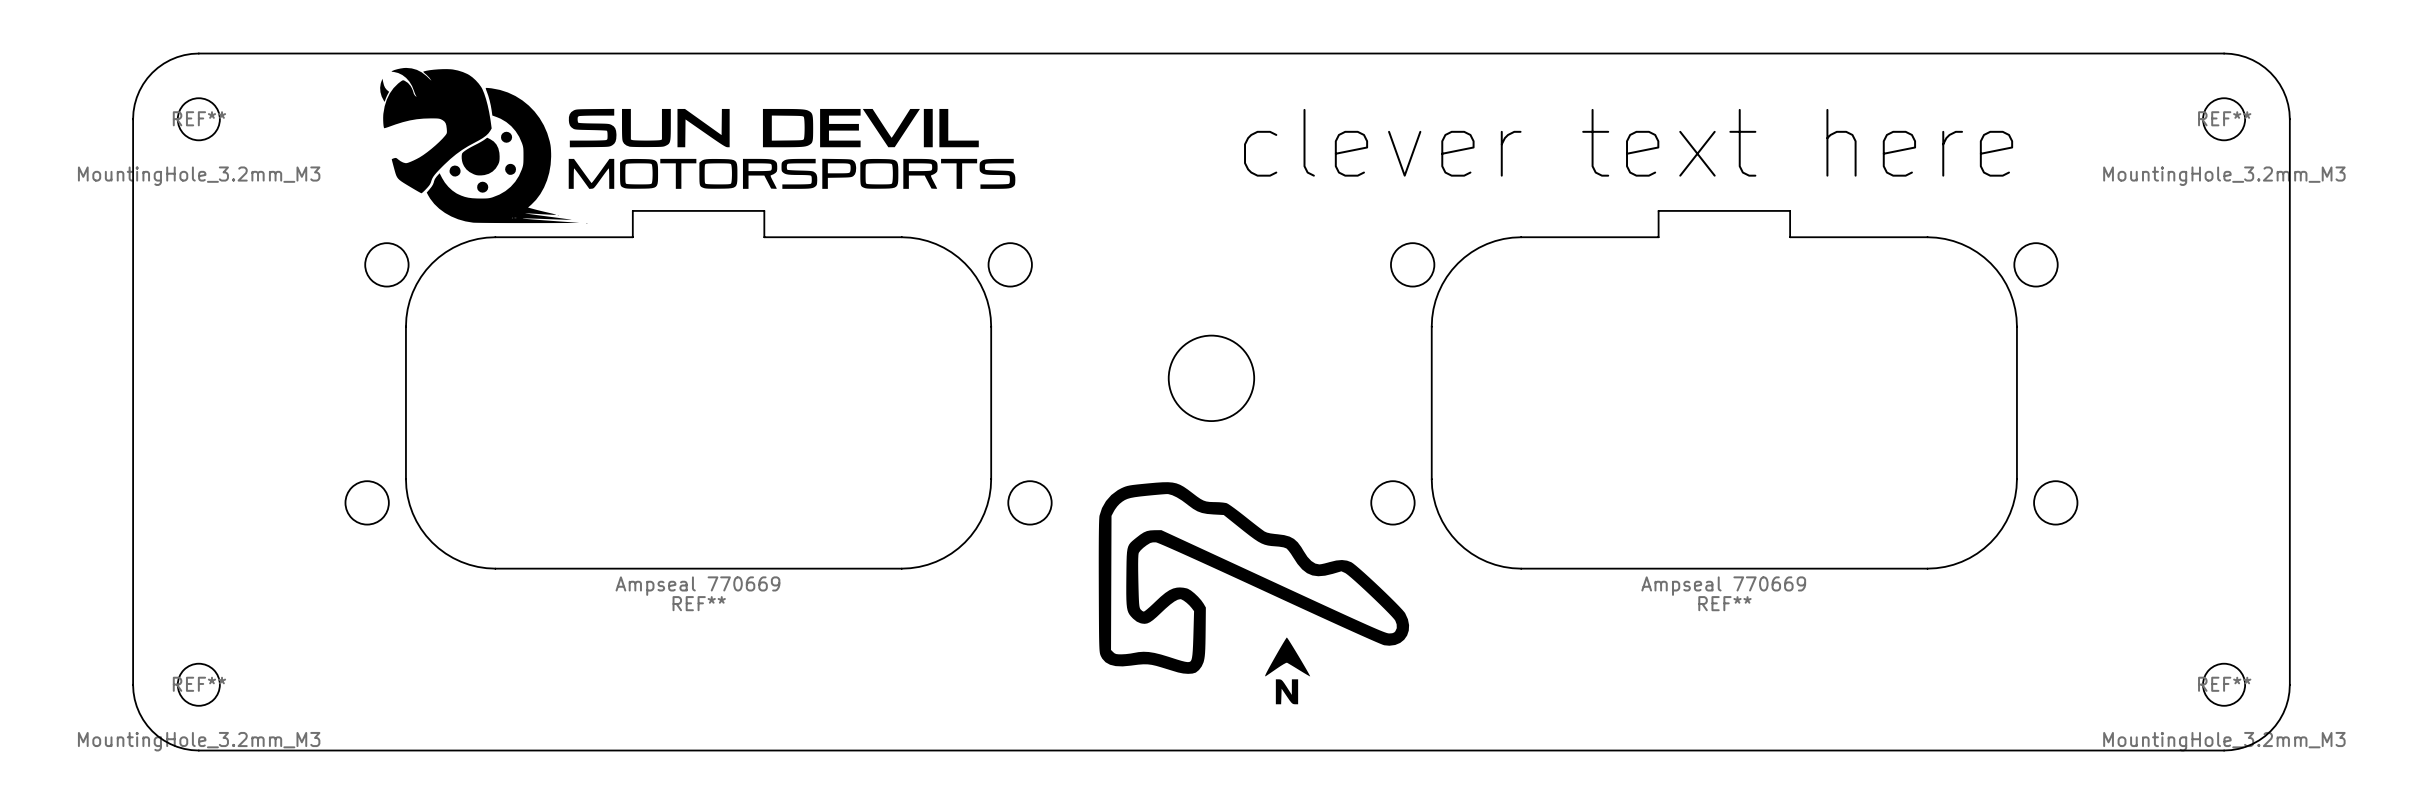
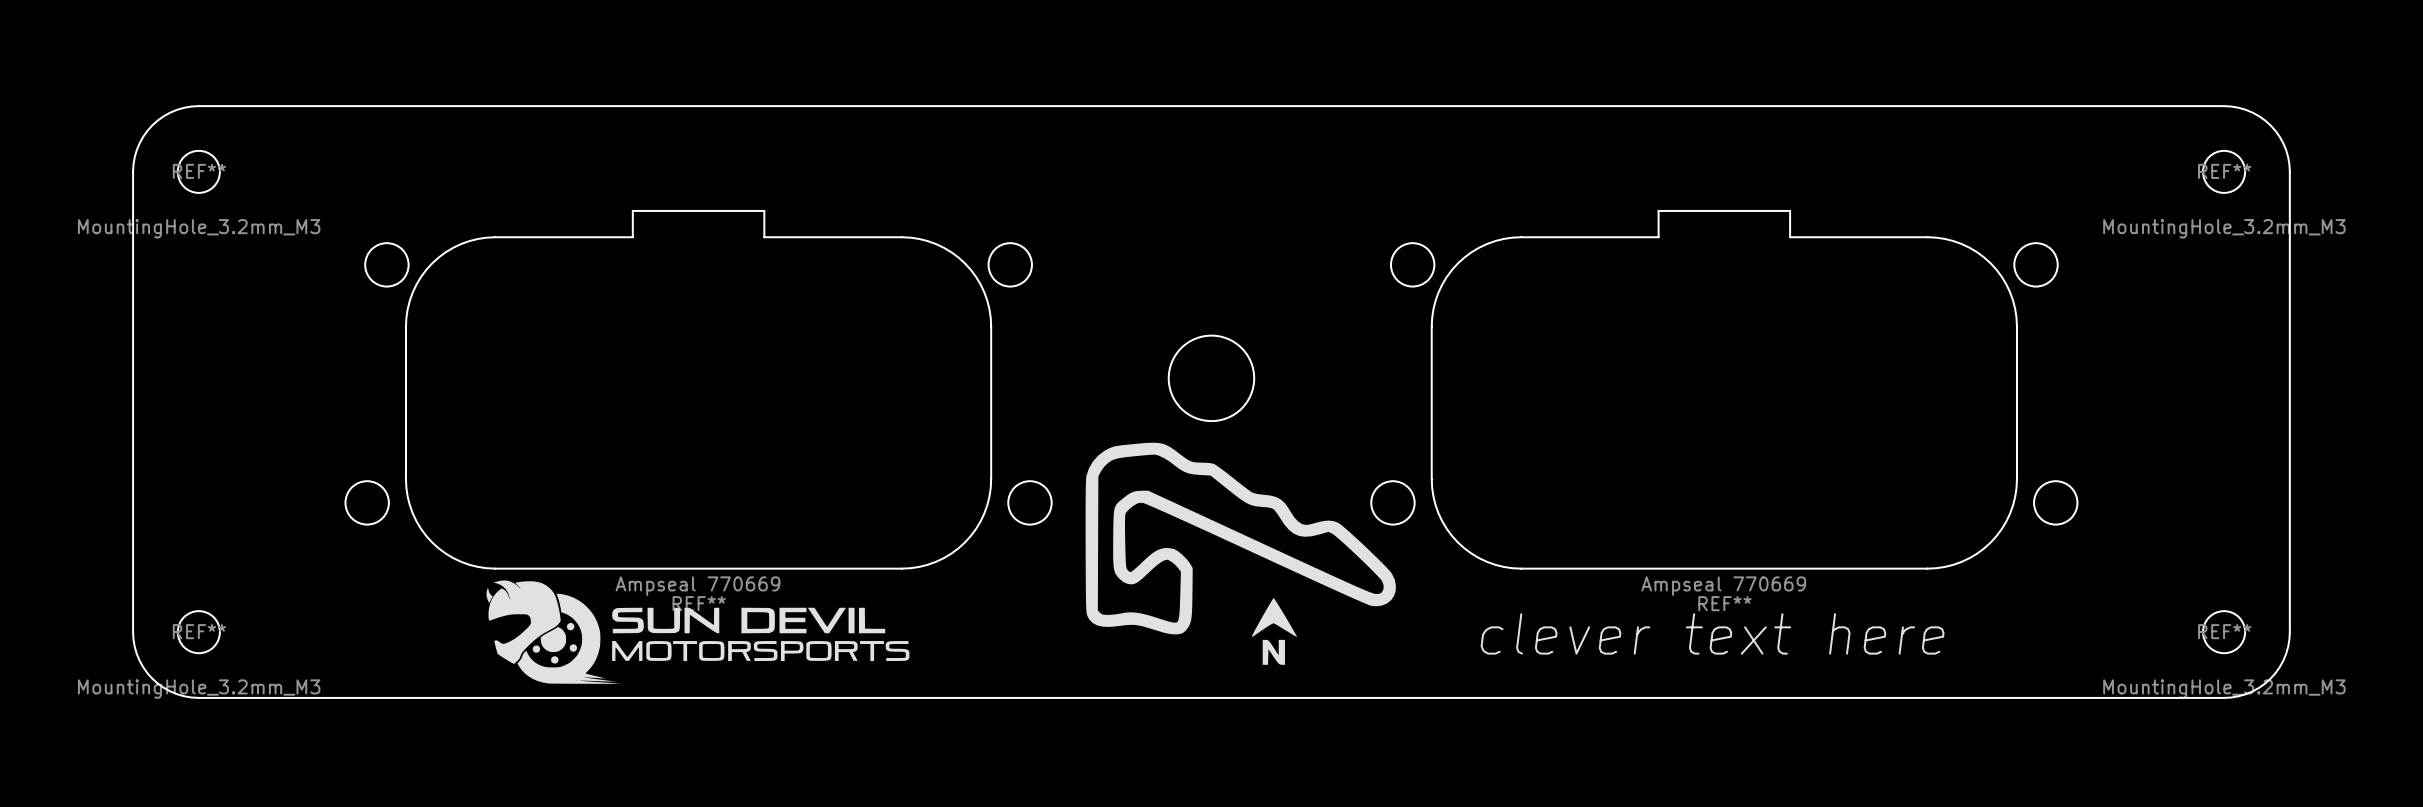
drawing: [380, 67, 1016, 224] -> none
REF** position: (198, 119) -> (198, 171)
REF** position: (2224, 119) -> (2224, 171)
text: clever text here (1628, 142) -> none
board edge: (133, 171) (133, 111) (136, 97) (143, 84) (152, 72) (170, 60) (184, 55) (198, 53) (2231, 53) (2245, 57) (2259, 63) (2270, 72) (2283, 90) (2289, 111) (2289, 171) -> (133, 171) (136, 150) (143, 136) (152, 125) (163, 116) (177, 109) (198, 106) (2224, 106) (2245, 109) (2259, 116) (2270, 125) (2279, 136) (2286, 150) (2289, 171)
drawing: none -> [486, 580, 910, 685]
drawing position: (1253, 593) -> (1240, 553)
board edge: (133, 632) (133, 692) (136, 706) (143, 719) (152, 731) (163, 740) (184, 748) (198, 750) (2231, 750) (2245, 746) (2259, 740) (2270, 731) (2283, 713) (2289, 692) (2289, 632) -> (133, 632) (134, 646) (139, 660) (152, 678) (170, 691) (184, 696) (198, 697) (2224, 697) (2245, 694) (2259, 687) (2270, 678) (2283, 660) (2288, 646) (2289, 632)
text: none -> clever text here (1712, 633)
REF** position: (198, 684) -> (198, 632)
REF** position: (2224, 684) -> (2224, 632)

